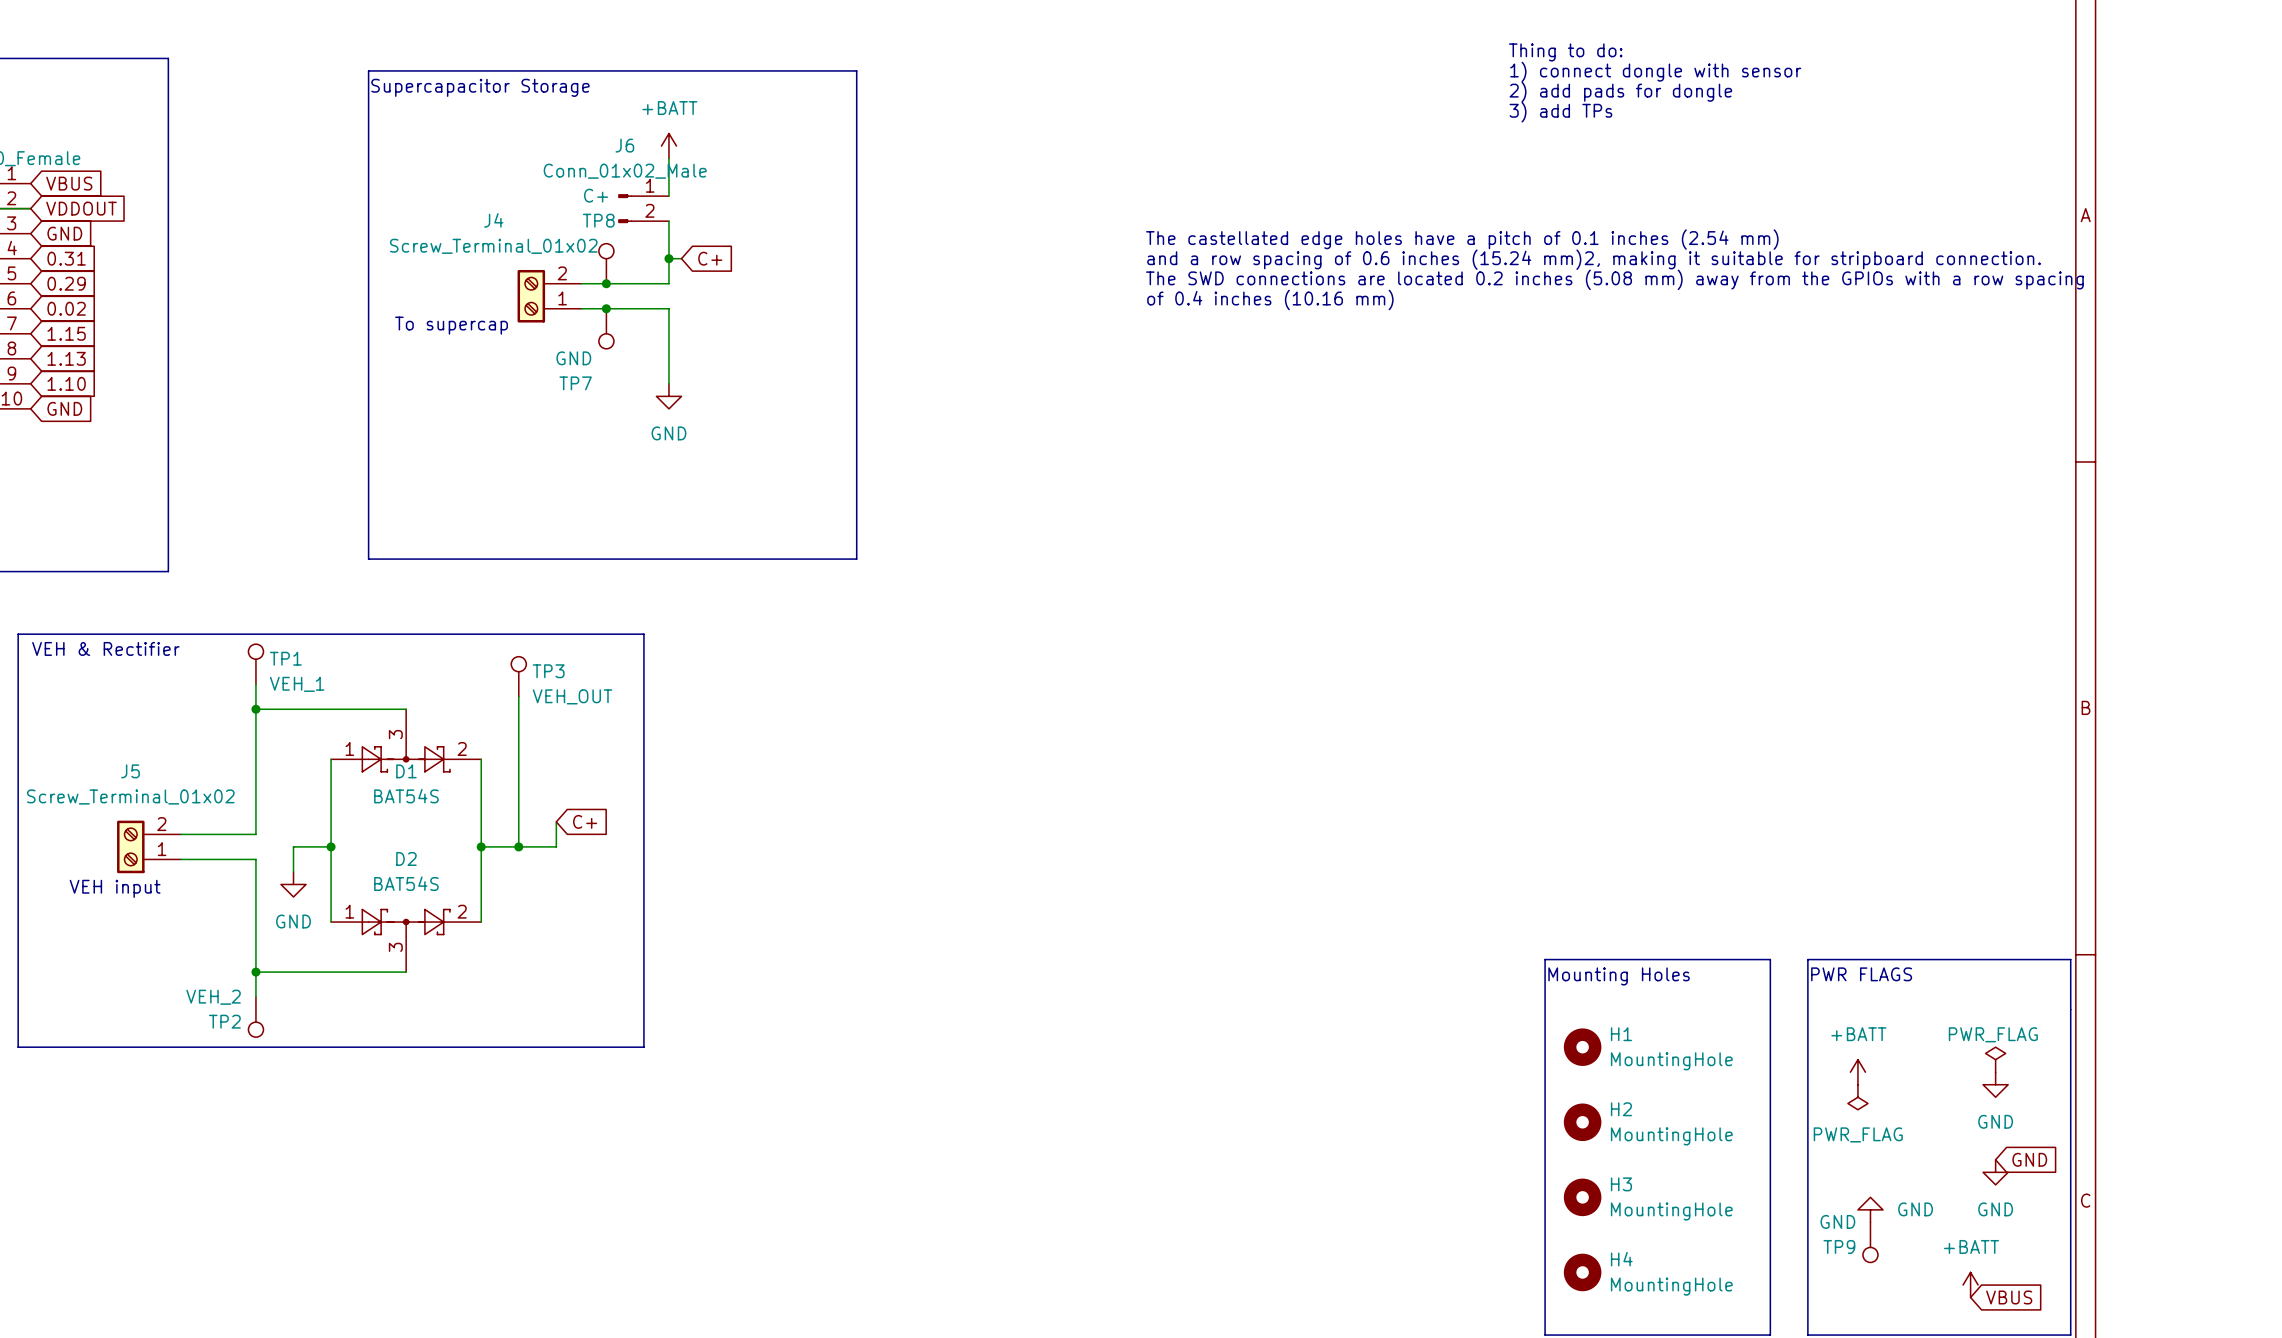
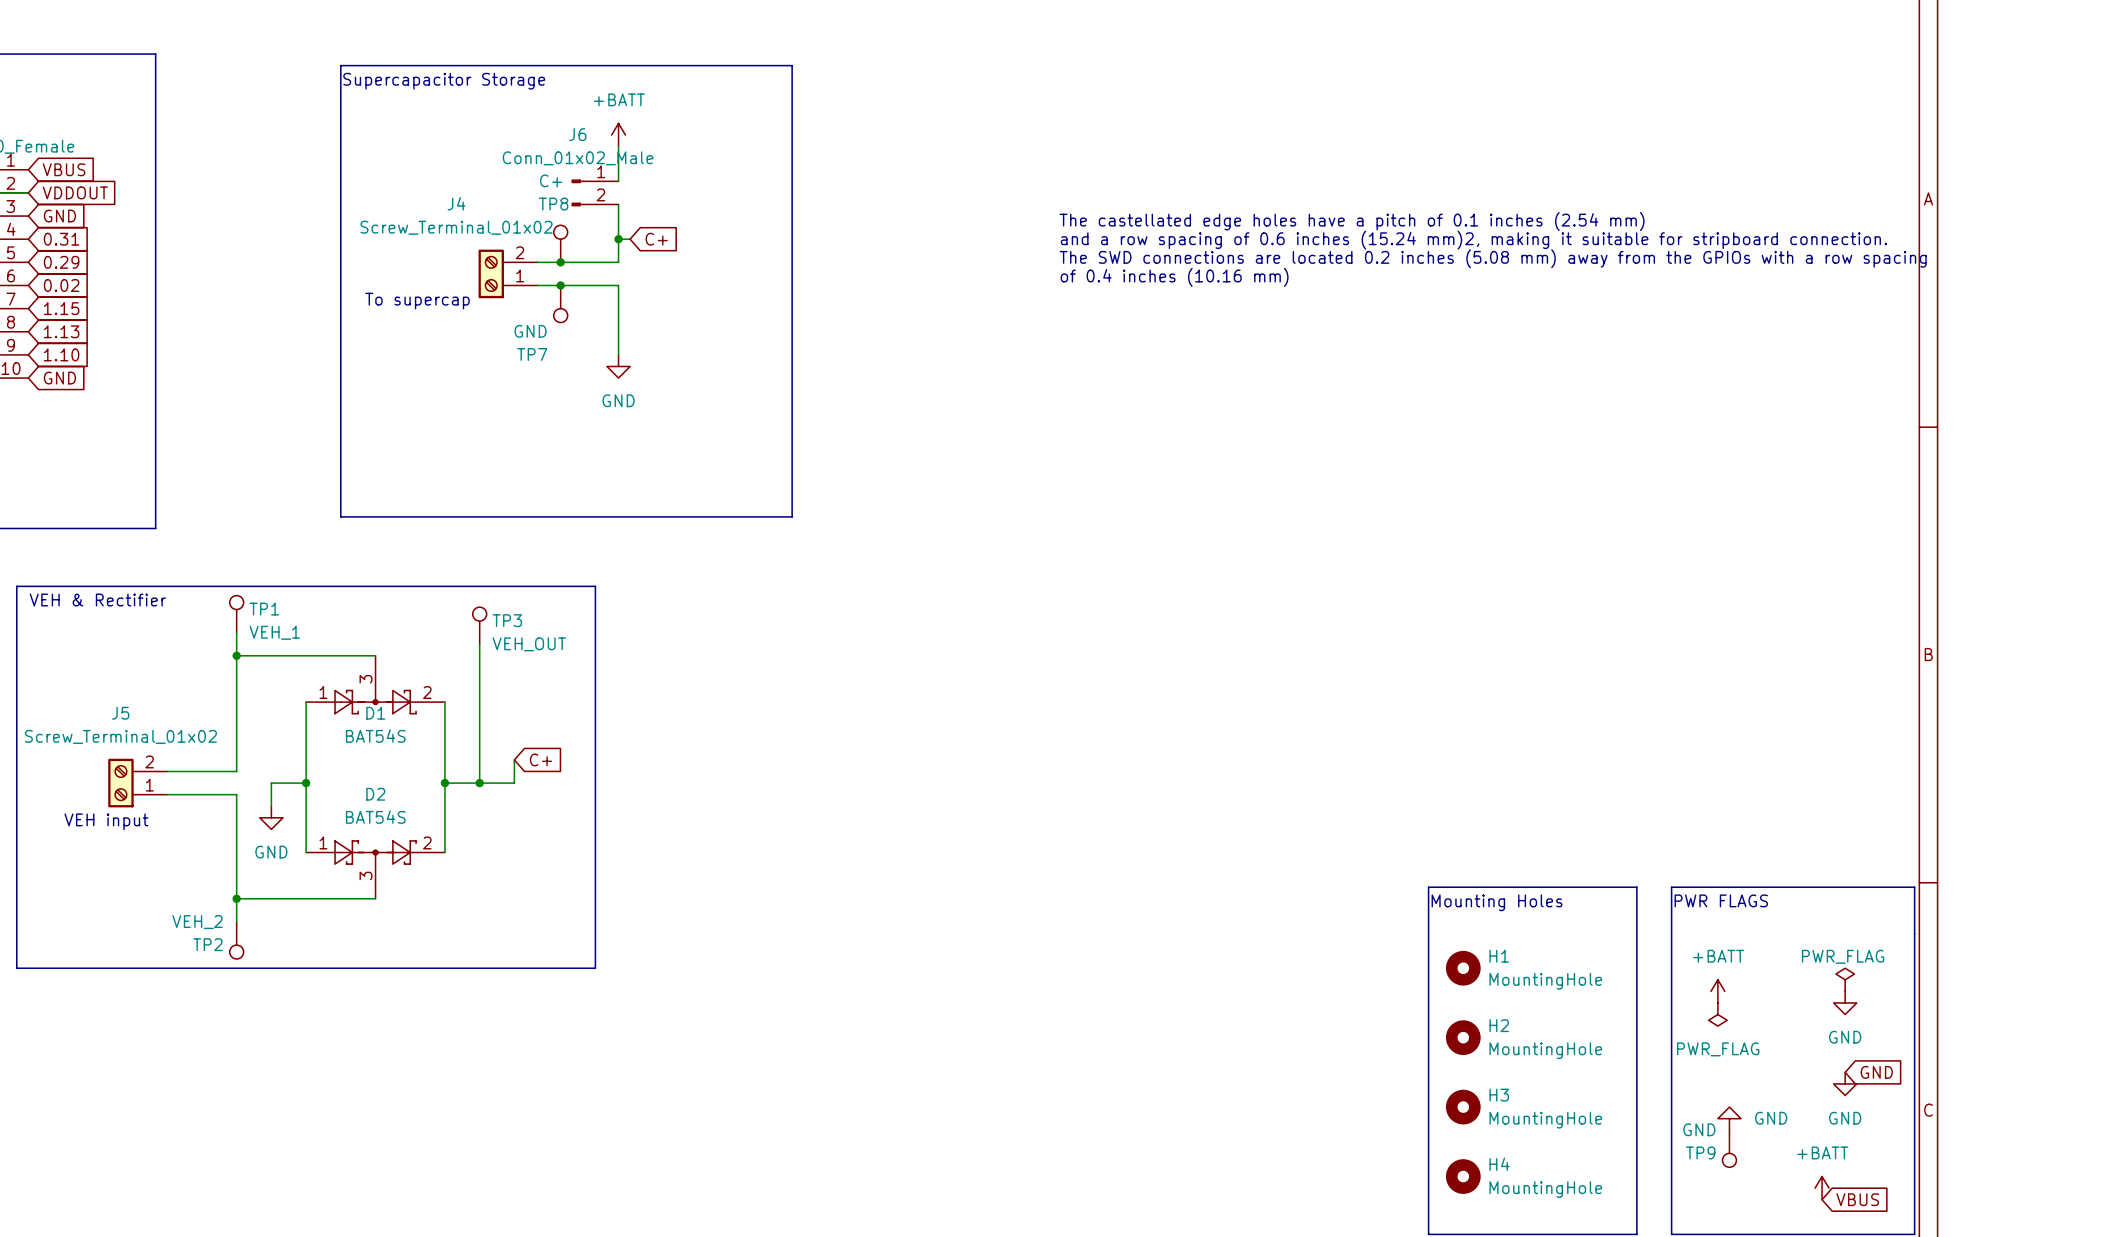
text: Thing to do: (1565, 52) -> none
text: 1) connect dongle with sensor (1655, 71) -> none
text: 2) add pads for dongle (1620, 92) -> none
text: 3) add TPs (1560, 112) -> none

